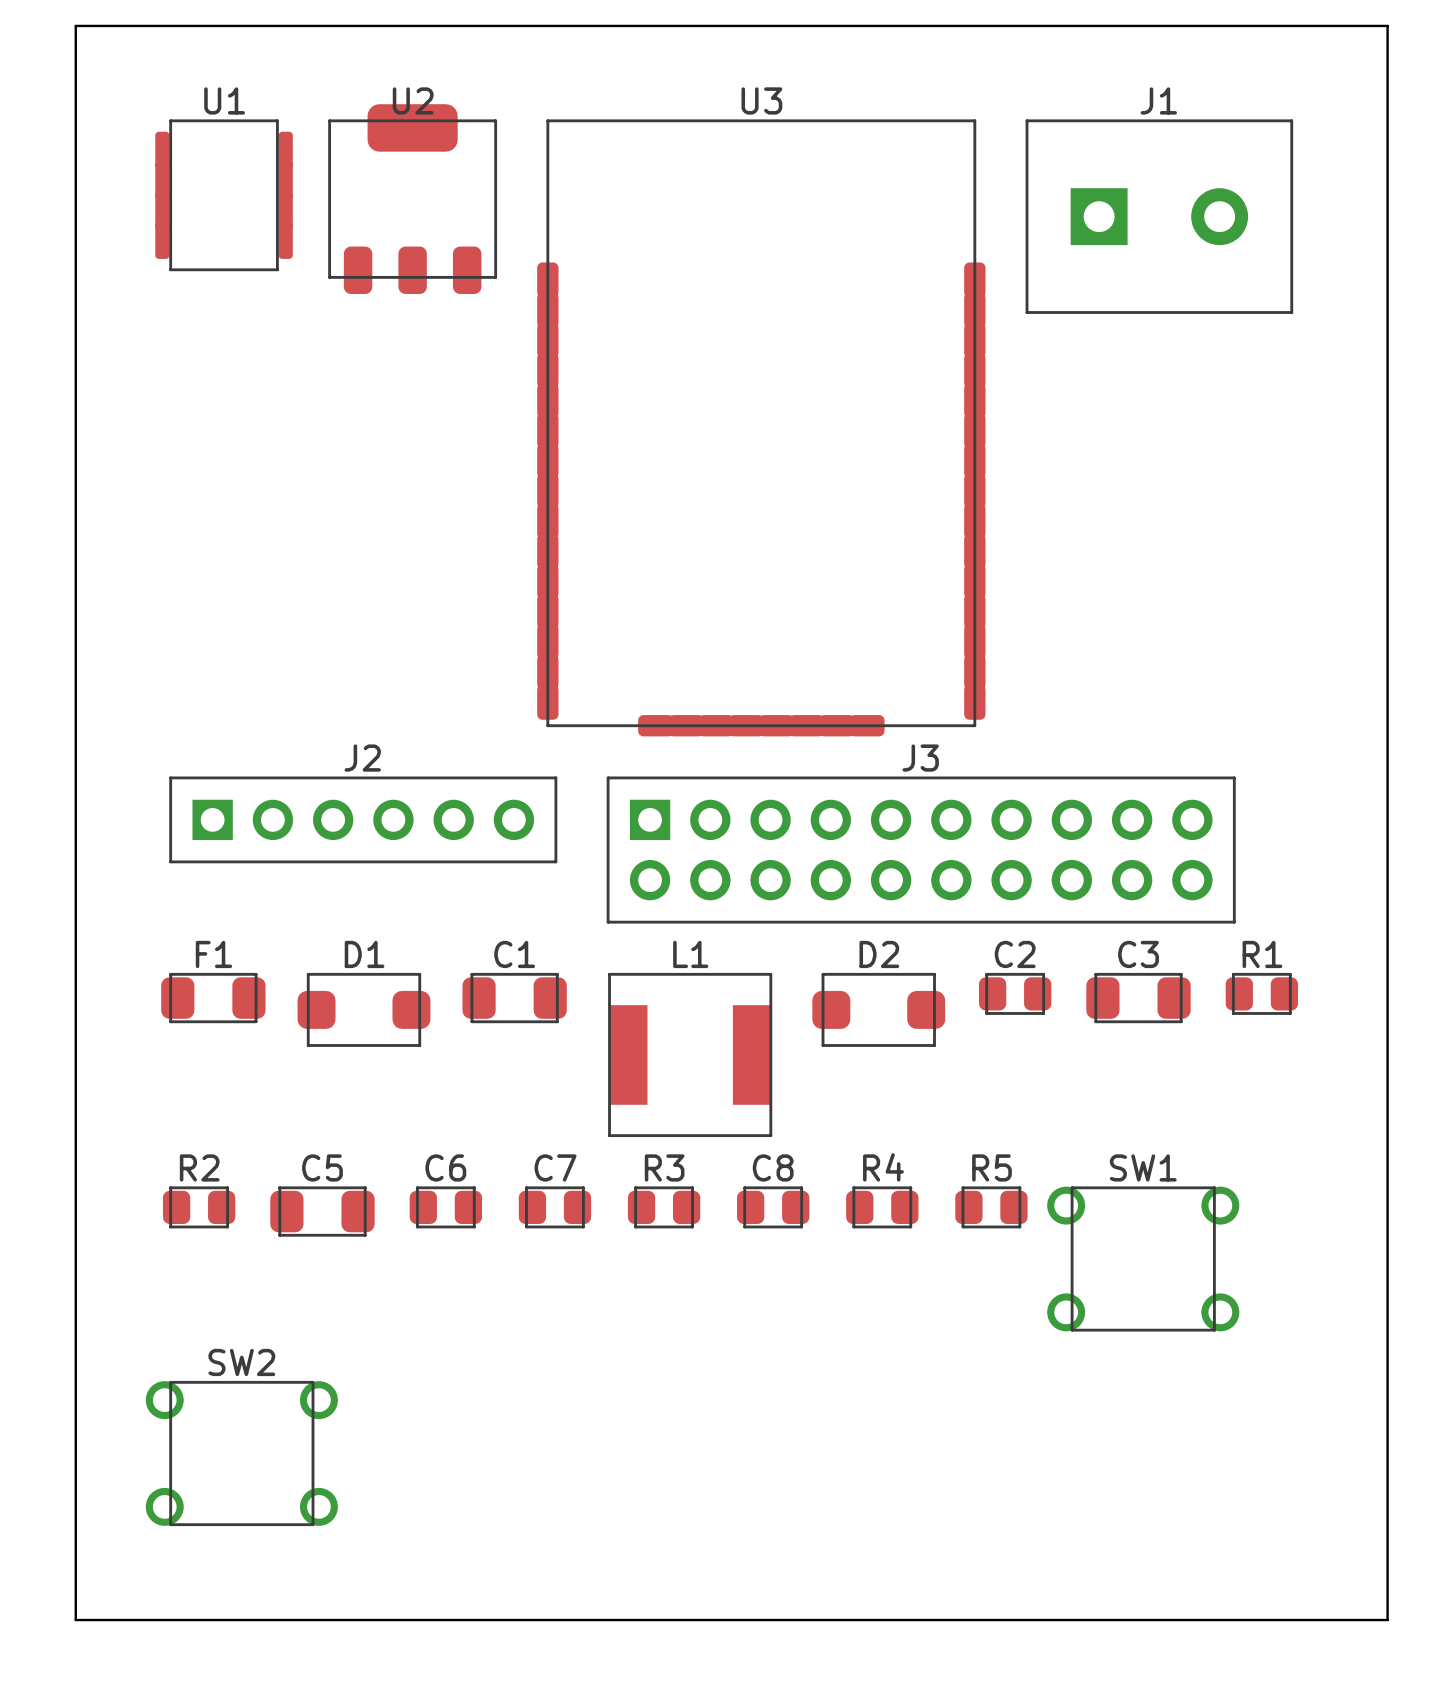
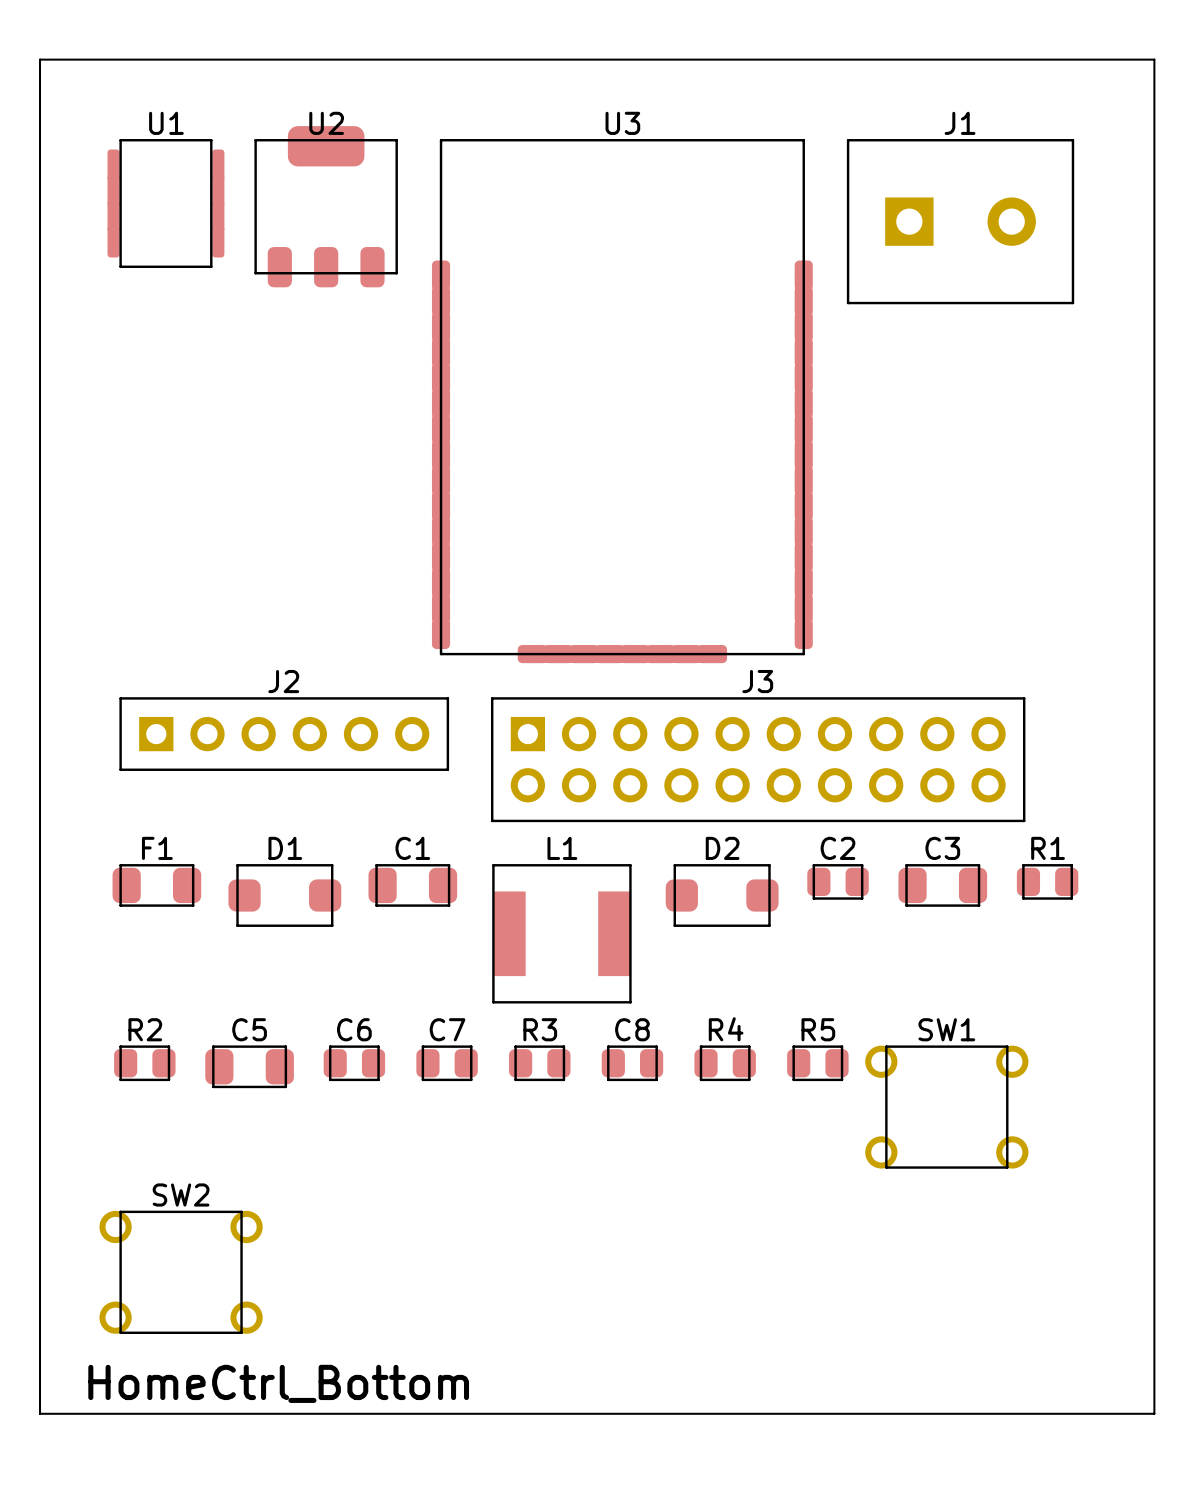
text: none -> HomeCtrl_Bottom (278, 1383)

